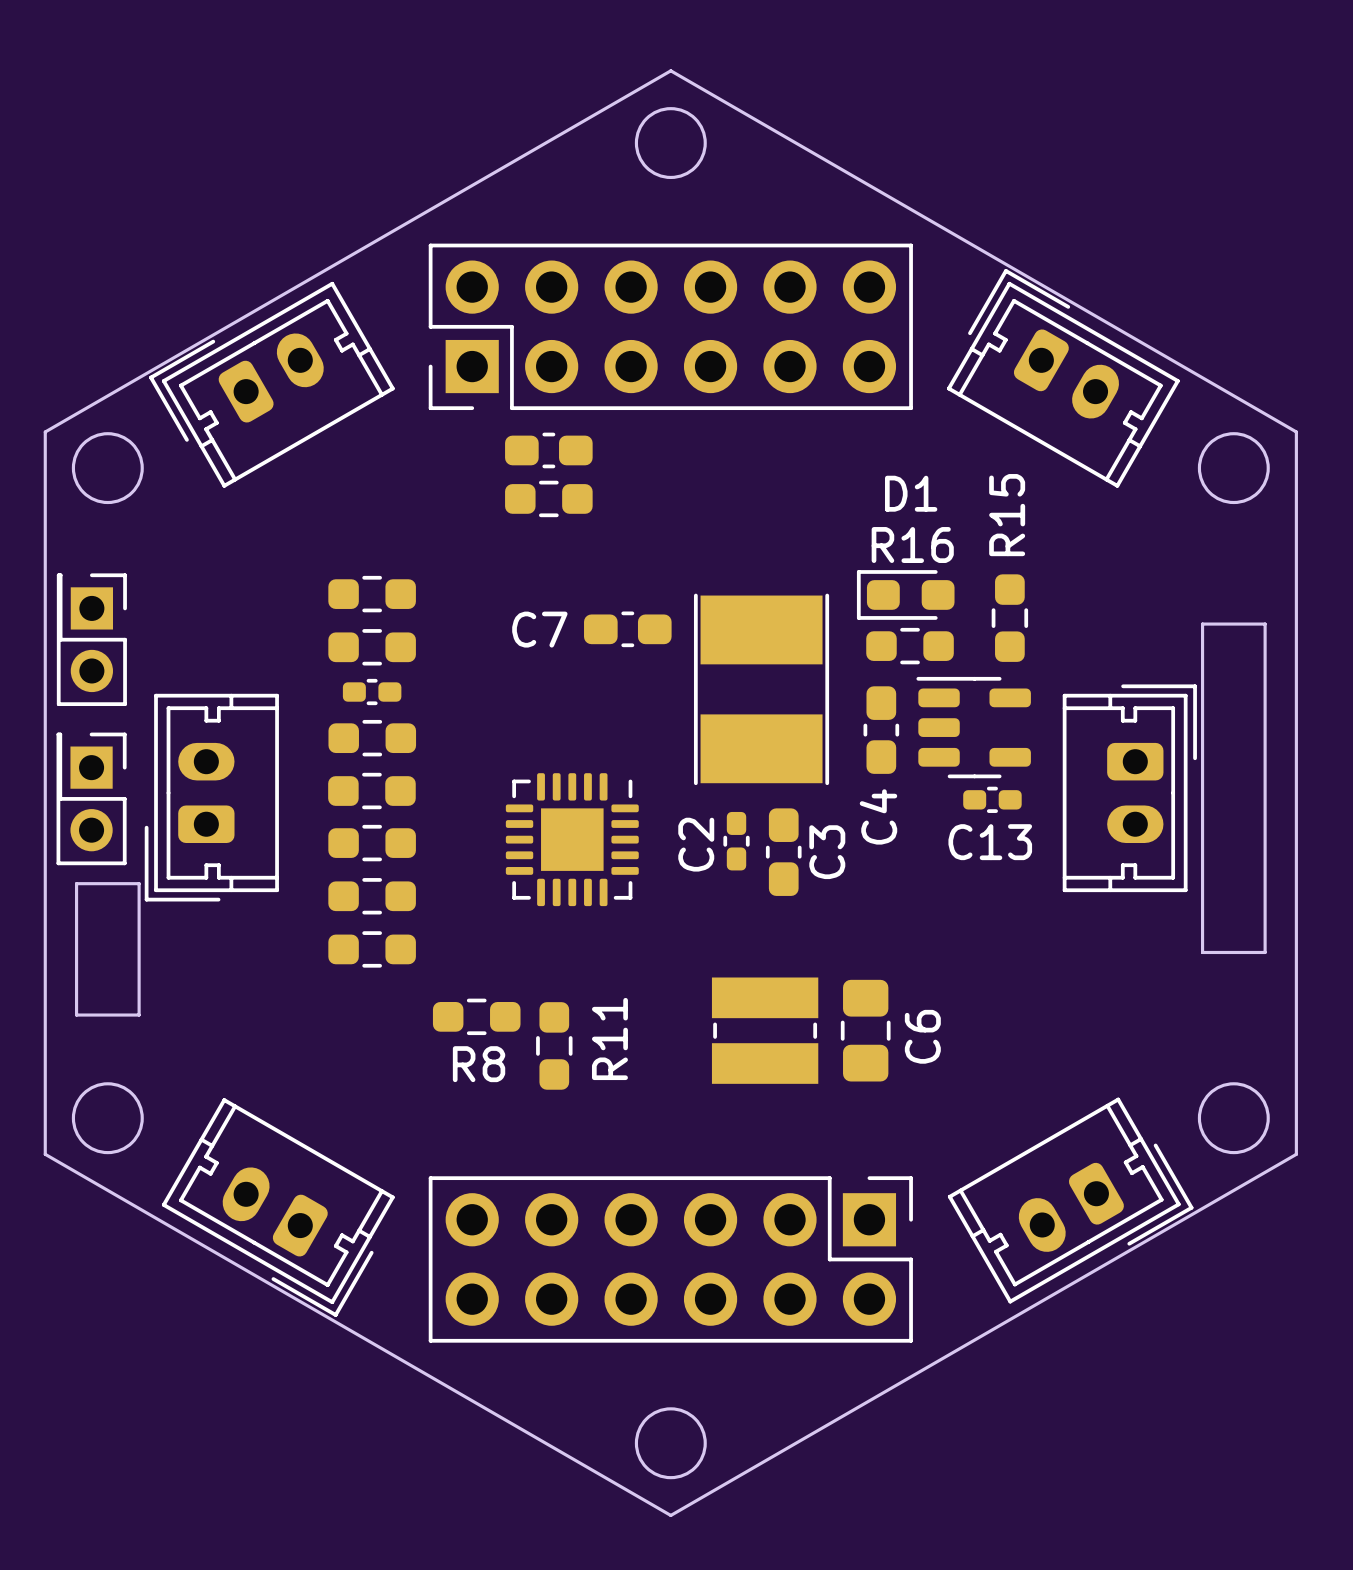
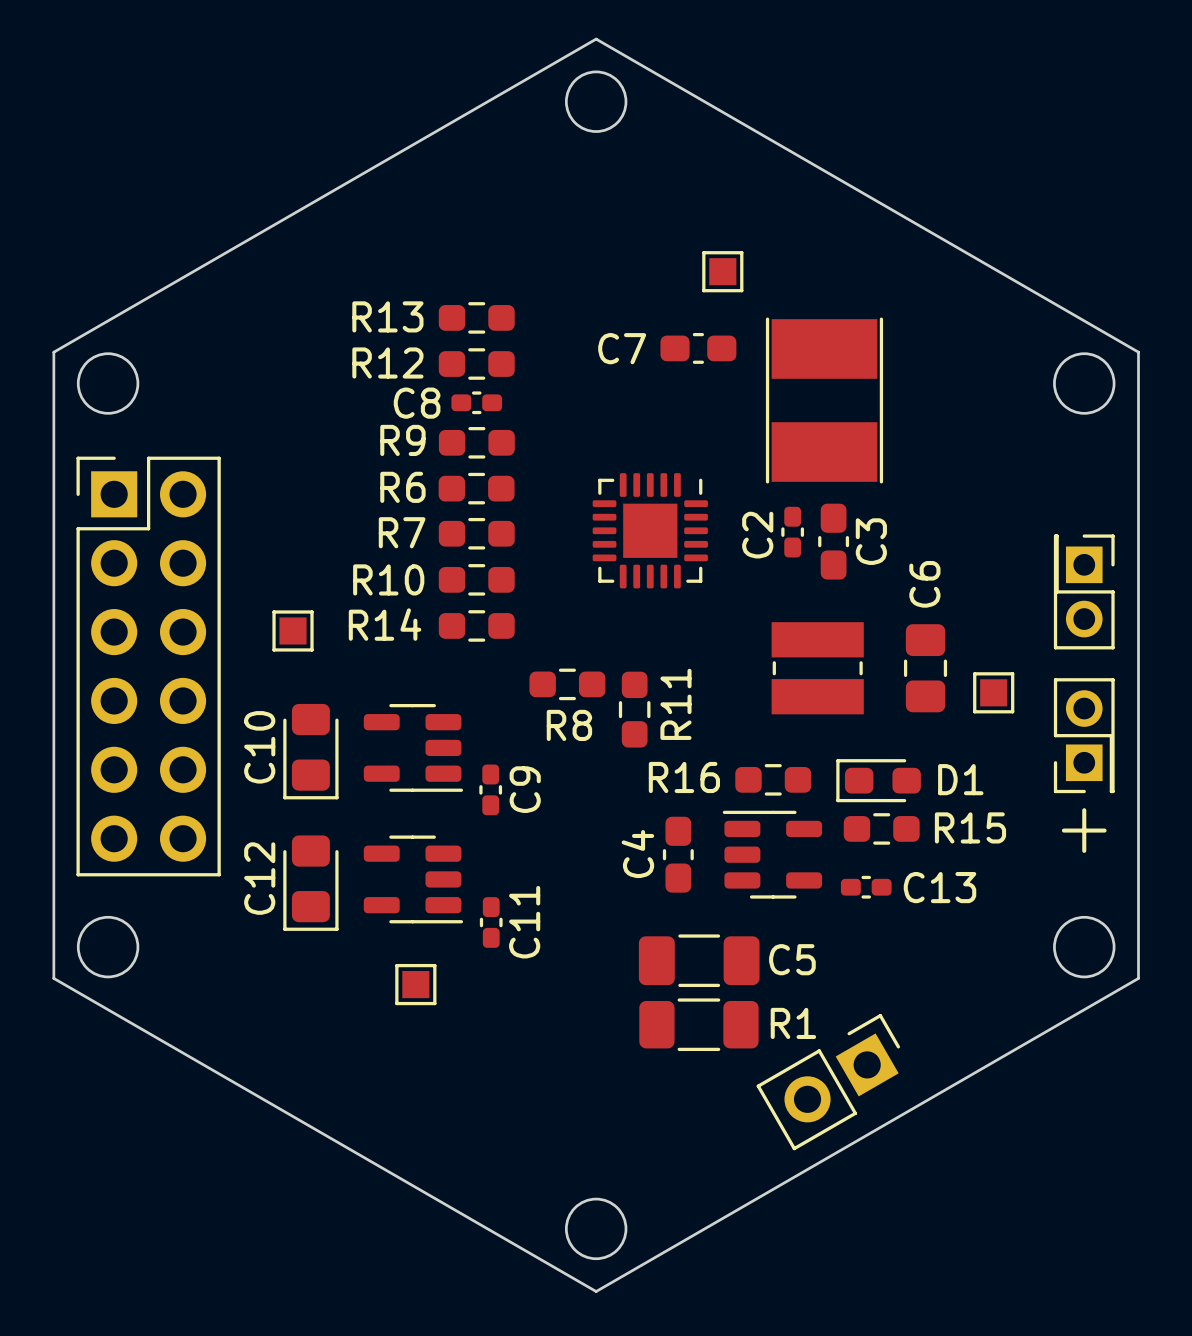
part: (670, 326) -> none
part: none -> (722, 271)
part: (1063, 378) -> none
part: (271, 384) -> none
R13: none -> (476, 317)
R12: none -> (476, 364)
part: (548, 450) -> none
C8: none -> (476, 402)
D1 name position: D1 (911, 493) -> D1 (960, 779)
part: (548, 498) -> none
R9: none -> (476, 442)
R16 name position: R16 (912, 545) -> R16 (684, 777)
R6: none -> (476, 488)
part: (372, 594) -> none
D1 position: (905, 594) -> (878, 780)
R15 rotation: 0° (1009, 618) -> 90° clockwise (881, 828)
R15 position: (1009, 618) -> (881, 828)
board edge: (1202, 624) (1265, 624) (1265, 952) (1202, 952) (1202, 624) -> none
C7 position: (627, 629) -> (698, 348)
part: (91, 639) -> none
R7: none -> (476, 533)
R16 position: (910, 646) -> (773, 779)
part: (372, 647) -> none
part position: (761, 689) -> (824, 400)
part: (372, 692) -> none
R10: none -> (476, 579)
part: none -> (1084, 591)
part: (973, 727) -> none
C4 position: (881, 730) -> (678, 854)
part: (372, 738) -> none
R14: none -> (476, 625)
part: none -> (293, 630)
part: (1129, 788) -> none
part: (371, 791) -> none
part: none -> (148, 666)
part: (211, 797) -> none
part: (91, 798) -> none
C13 position: (992, 799) -> (866, 887)
C4 name position: C4 (878, 816) -> C4 (637, 854)
part: none -> (993, 692)
part position: (572, 839) -> (650, 530)
C2 position: (736, 841) -> (792, 532)
C13 name position: C13 (990, 842) -> C13 (940, 887)
part: (372, 843) -> none
C3 position: (783, 852) -> (833, 541)
part: none -> (1084, 735)
board edge: (76, 883) (139, 883) (139, 1015) (76, 1015) (76, 883) -> none
part: none -> (413, 747)
C10: none -> (310, 751)
part: (372, 896) -> none
C9: none -> (490, 789)
part: (372, 949) -> none
line: none -> (1084, 810) (1084, 850)
line: none -> (1063, 830) (1104, 830)
part: none -> (772, 854)
R8 position: (476, 1016) -> (567, 684)
part position: (765, 1030) -> (817, 668)
C6 position: (865, 1030) -> (925, 668)
C6 name position: C6 (922, 1036) -> C6 (924, 584)
R11 name position: R11 (609, 1038) -> R11 (675, 704)
part: none -> (413, 879)
C12: none -> (310, 883)
R11 position: (554, 1045) -> (634, 709)
C11: none -> (491, 922)
C5: none -> (699, 960)
part: none -> (415, 984)
part: (1070, 1200) -> none
part: (278, 1207) -> none
R1: none -> (698, 1024)
part: (670, 1259) -> none
part: none -> (828, 1082)

